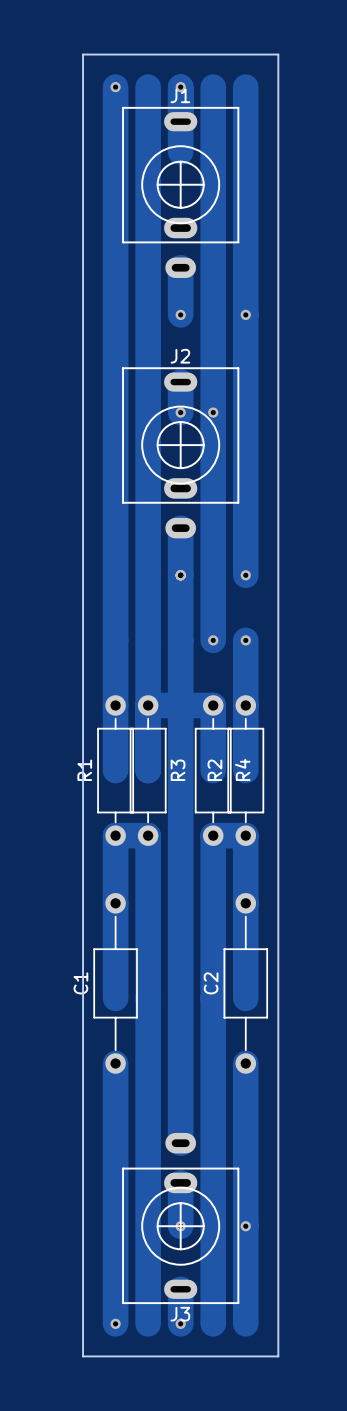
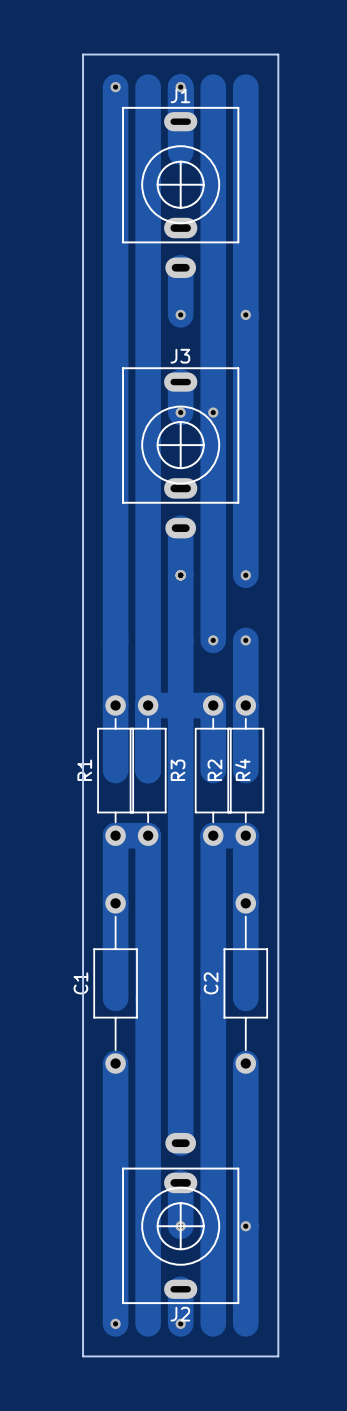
J2 name: J2 (180, 356) -> J3 (180, 356)
J3 name: J3 (180, 1314) -> J2 (180, 1314)

